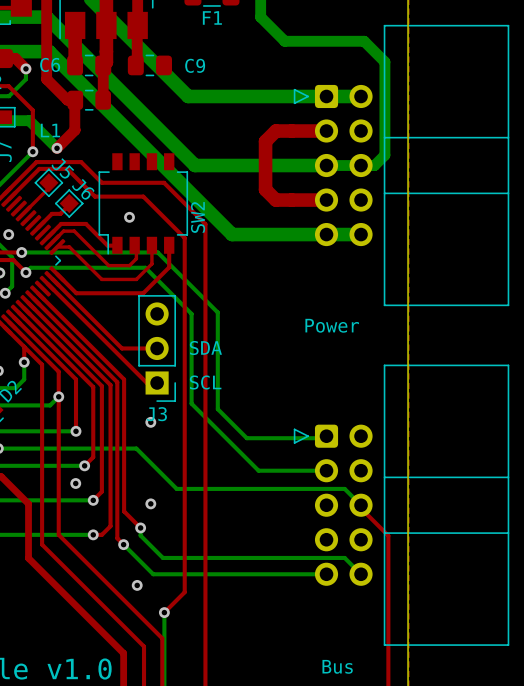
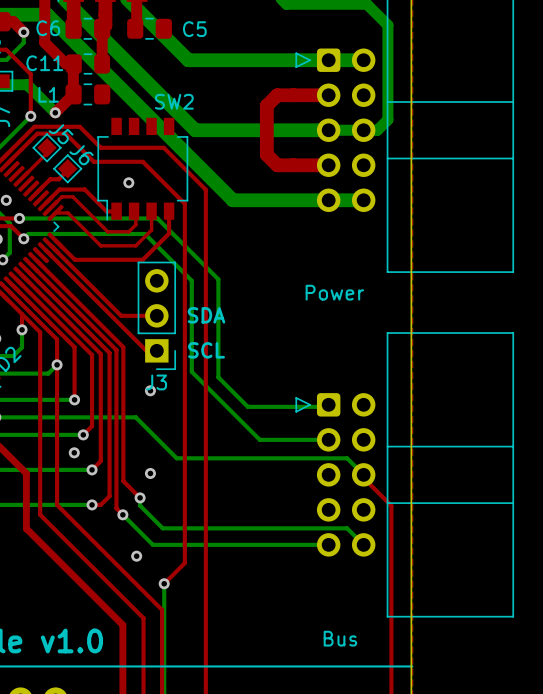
C9 name: C9 (195, 65) -> C5 (194, 29)
C11: none -> (87, 94)
SW2 name rotation: 0° (198, 217) -> 90° clockwise (174, 101)
SW2 name position: SW2 (198, 217) -> SW2 (174, 101)

